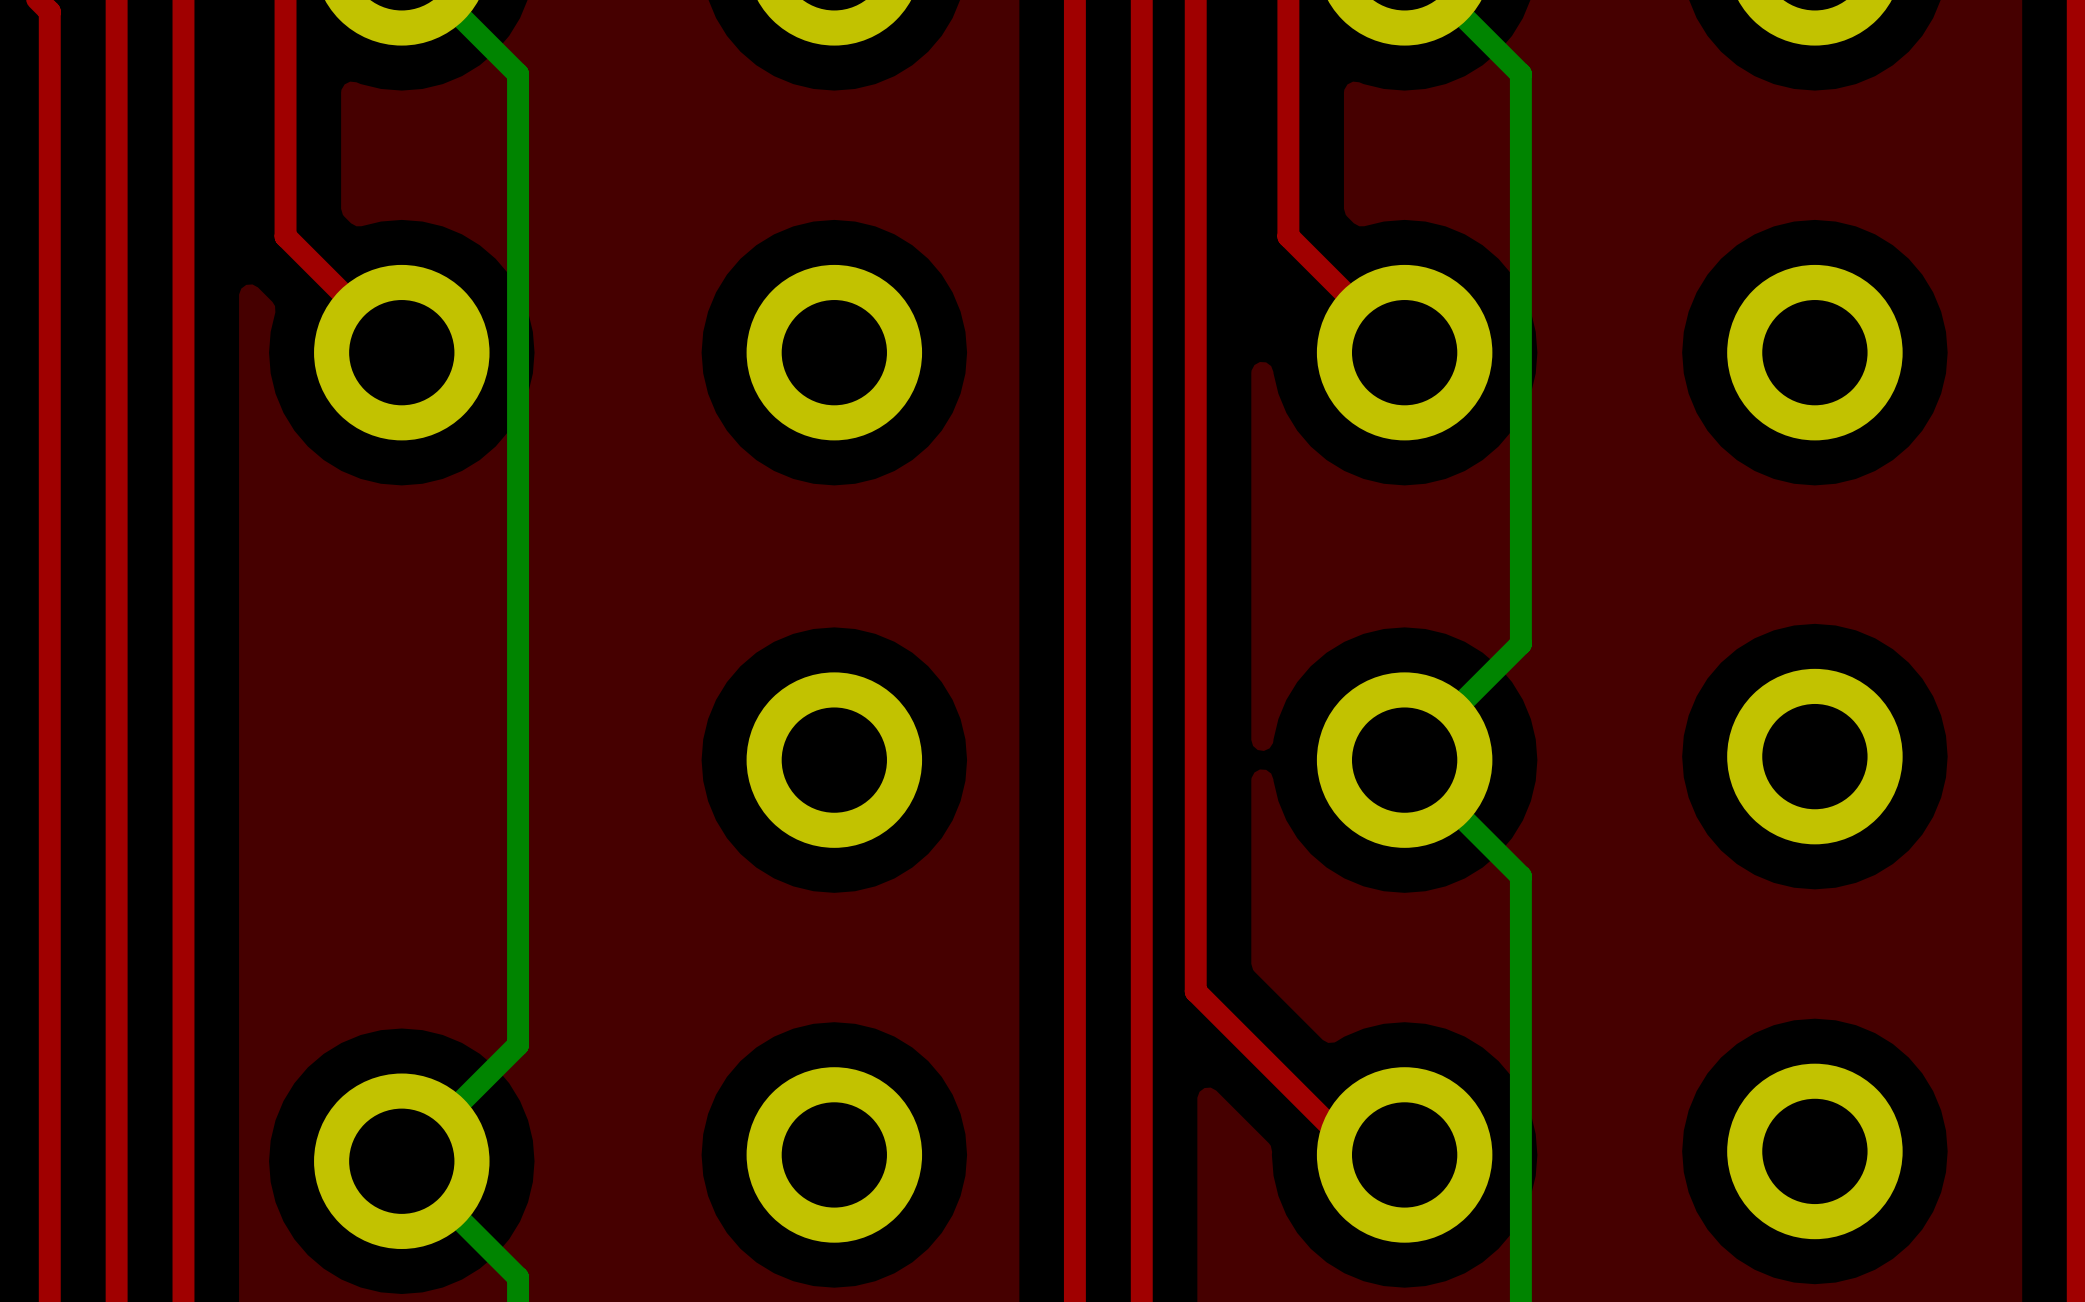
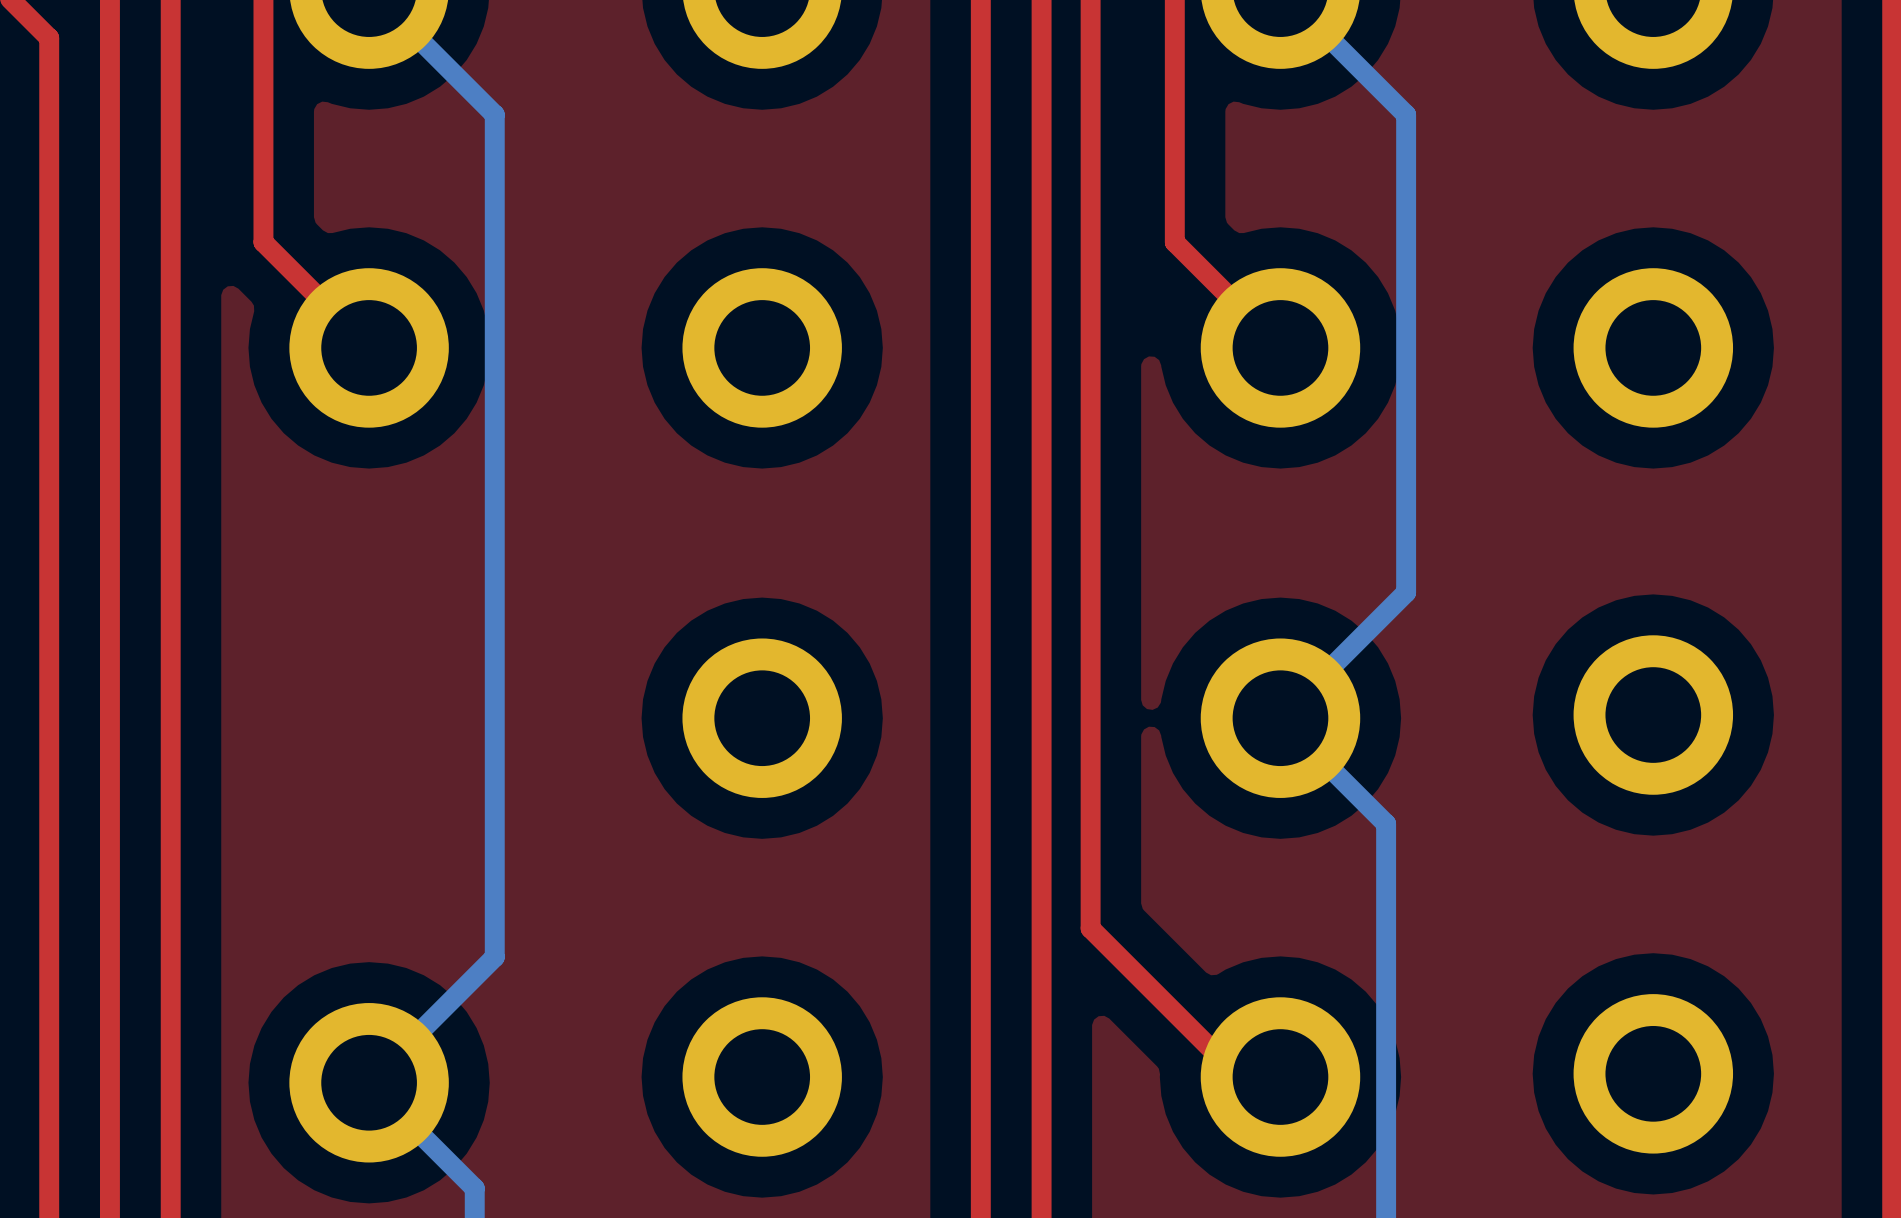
bottom track: (518, 74) (518, 1045) -> (474, 94) (494, 114) (494, 957) (474, 977)
bottom track: (1520, 74) (1520, 643) -> (1386, 94) (1406, 114) (1406, 592) (1386, 612)

